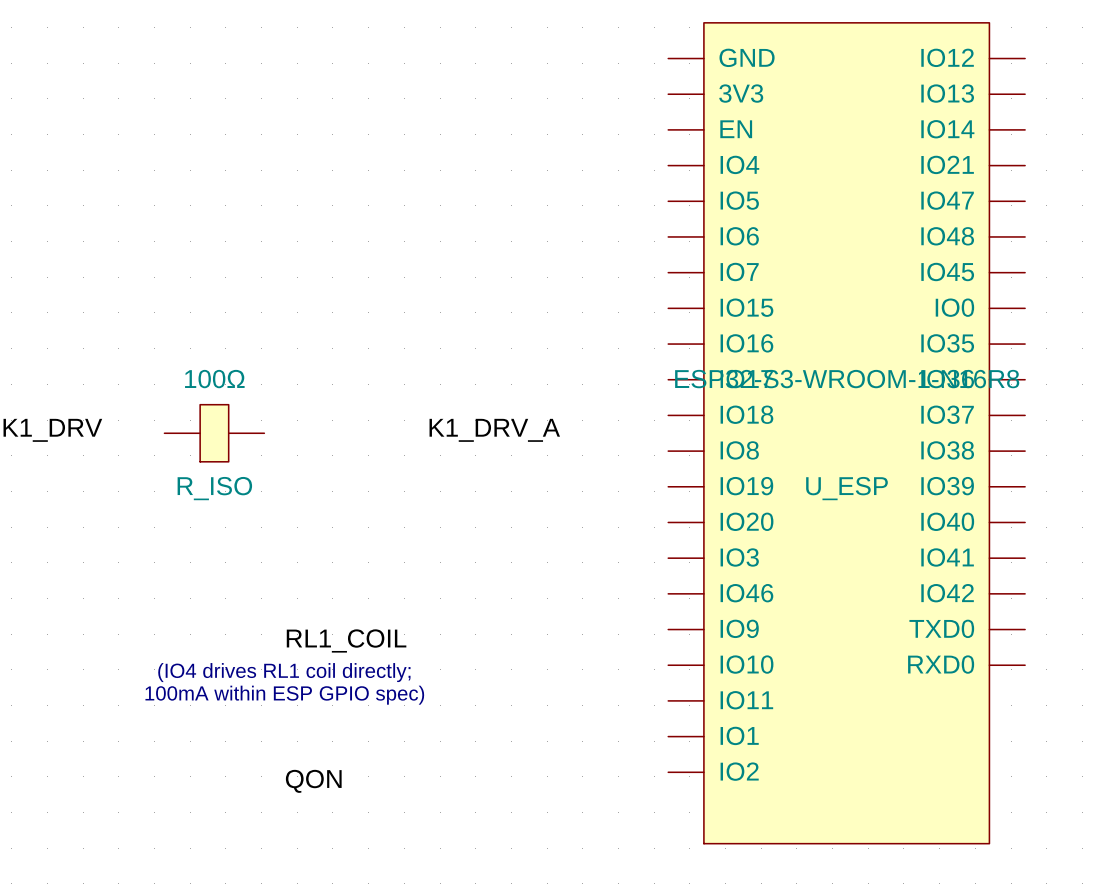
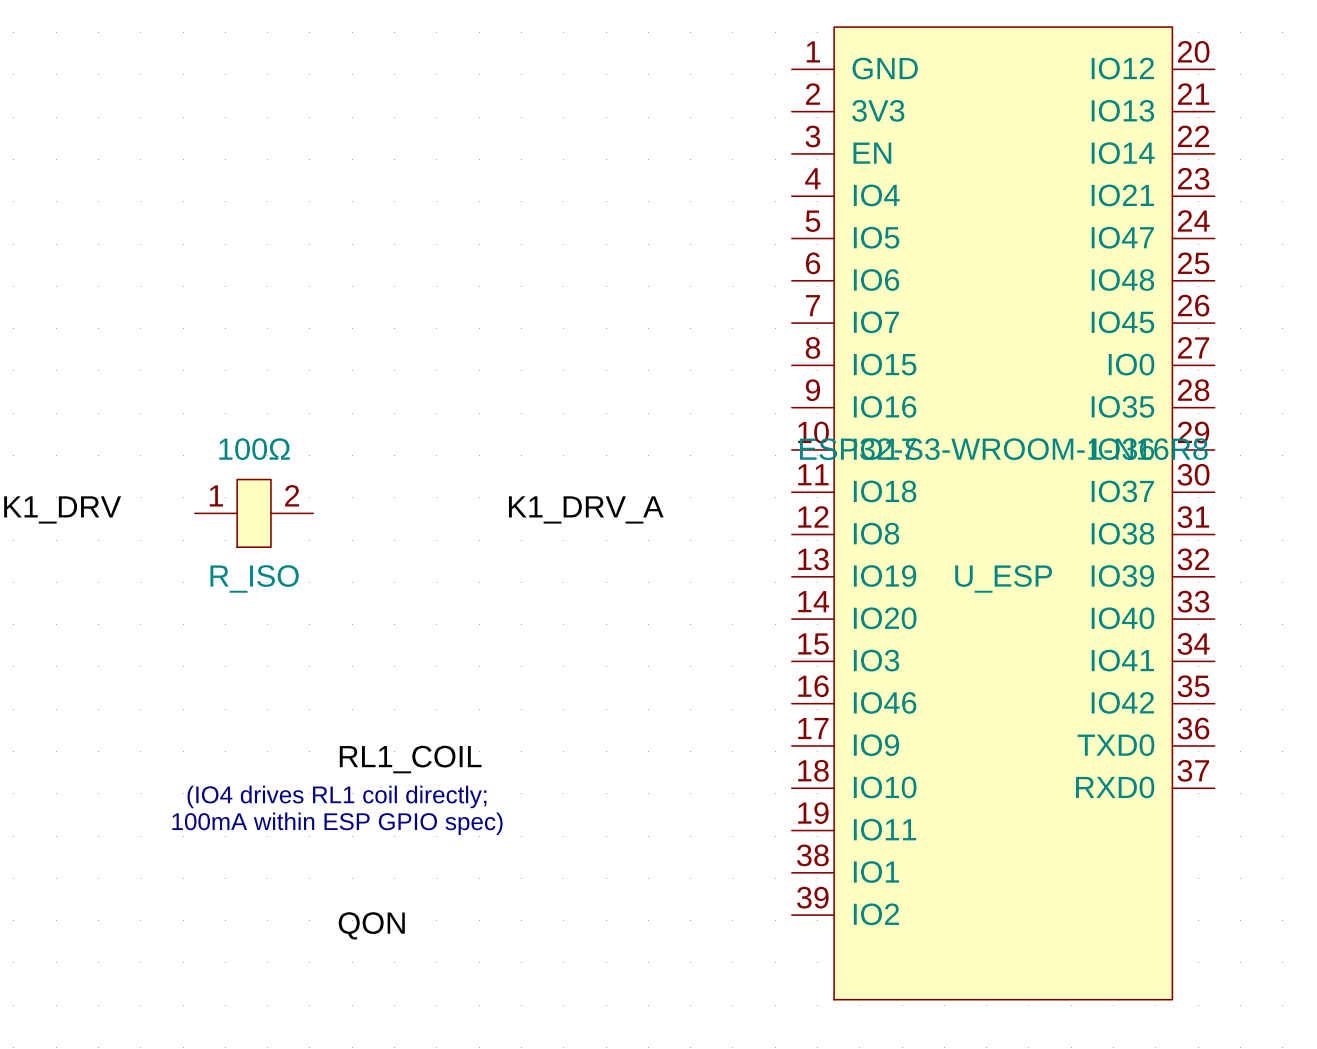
U_ESP symbol: [668, 22, 1026, 844] -> [791, 27, 1215, 1000]
R_ISO pin number: none -> 1 (216, 495)
R_ISO pin number: none -> 2 (292, 495)

